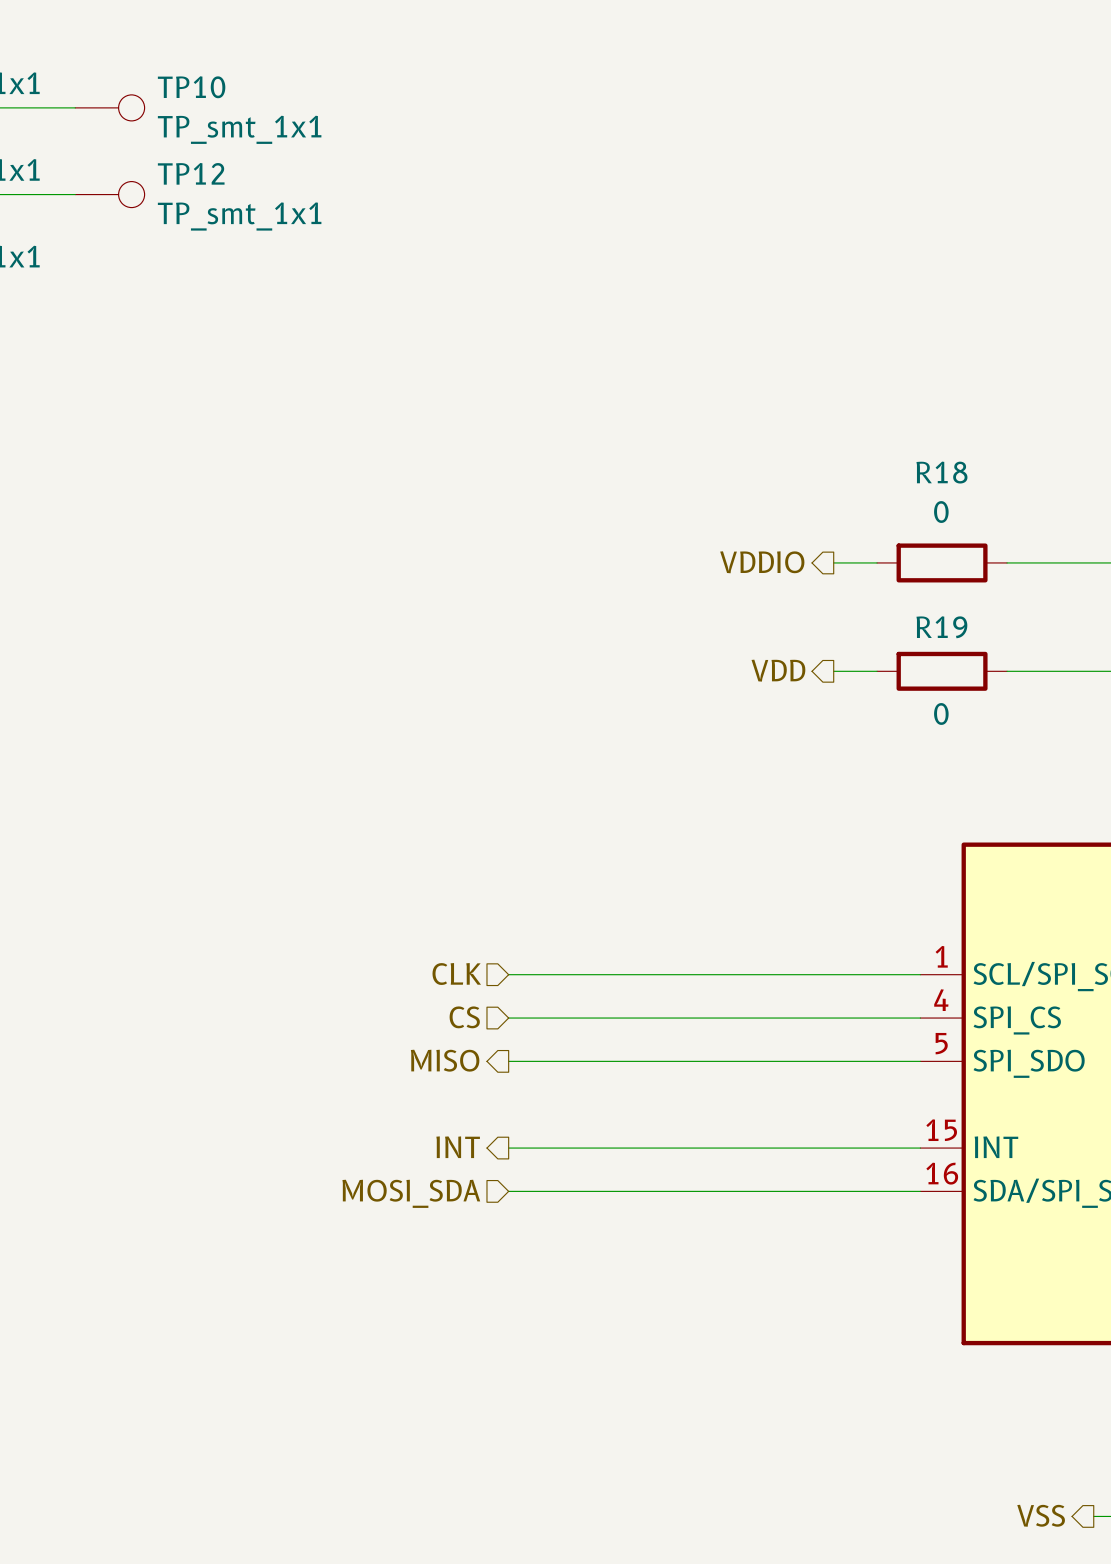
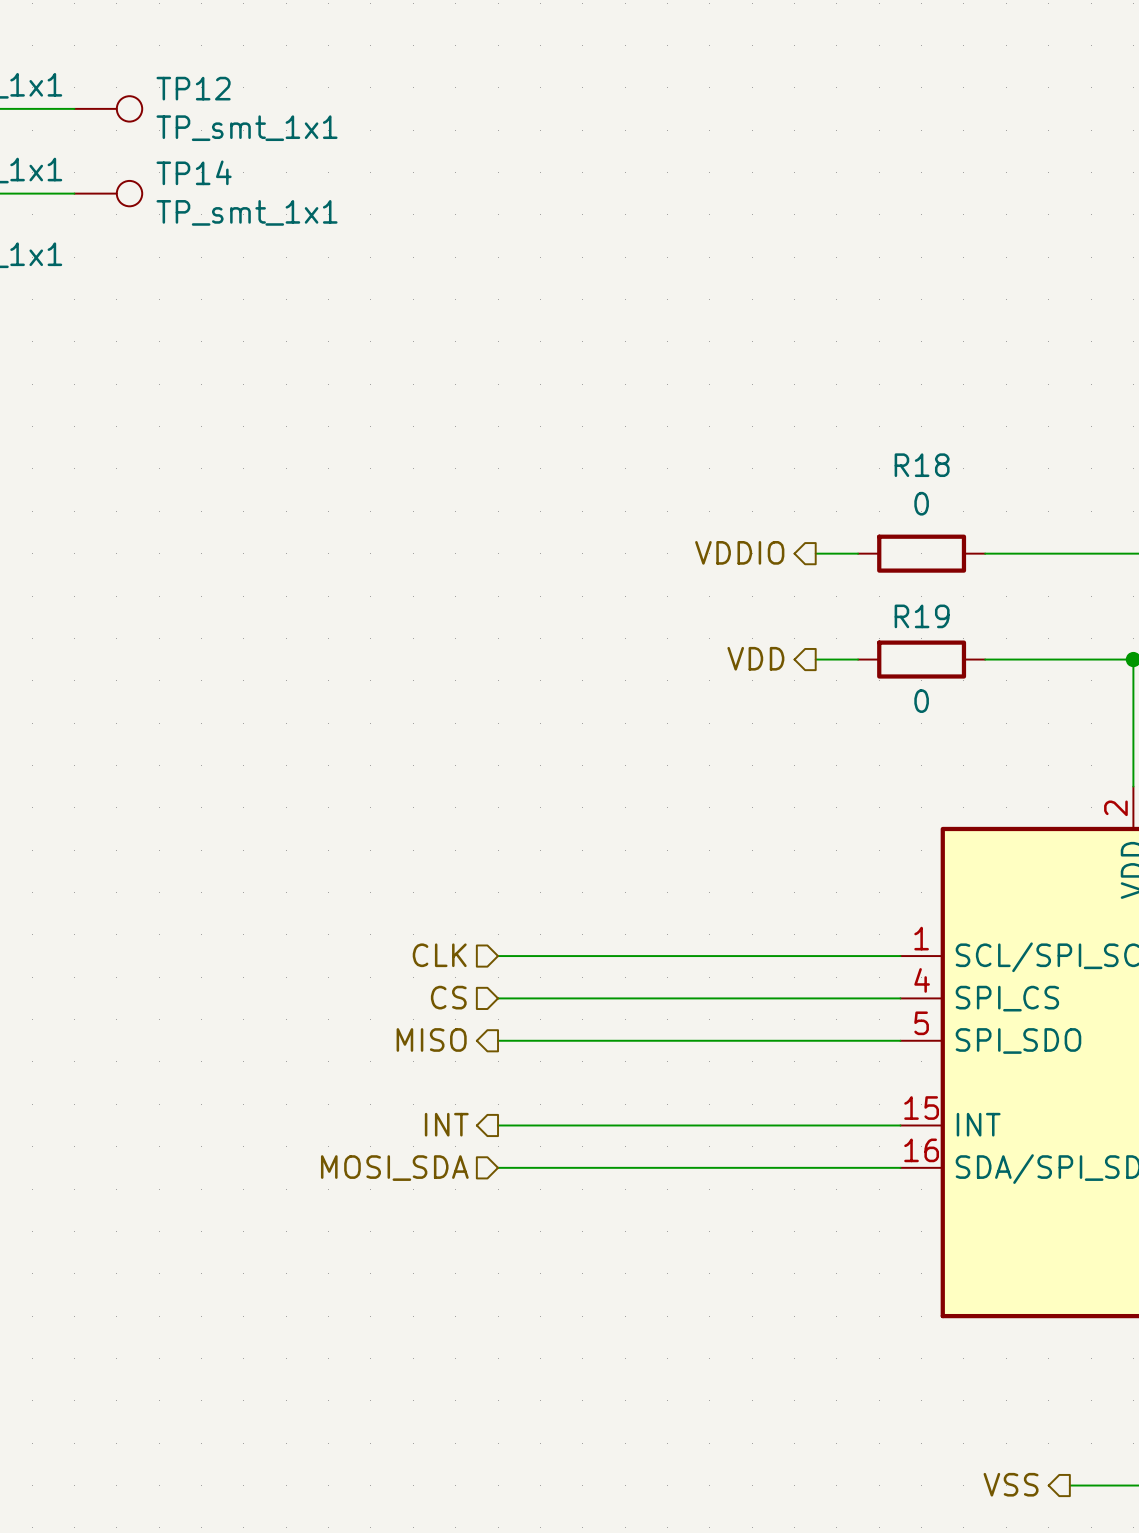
TP10 name: TP10 (191, 87) -> TP12 (193, 88)
TP12 name: TP12 (191, 173) -> TP14 (194, 172)

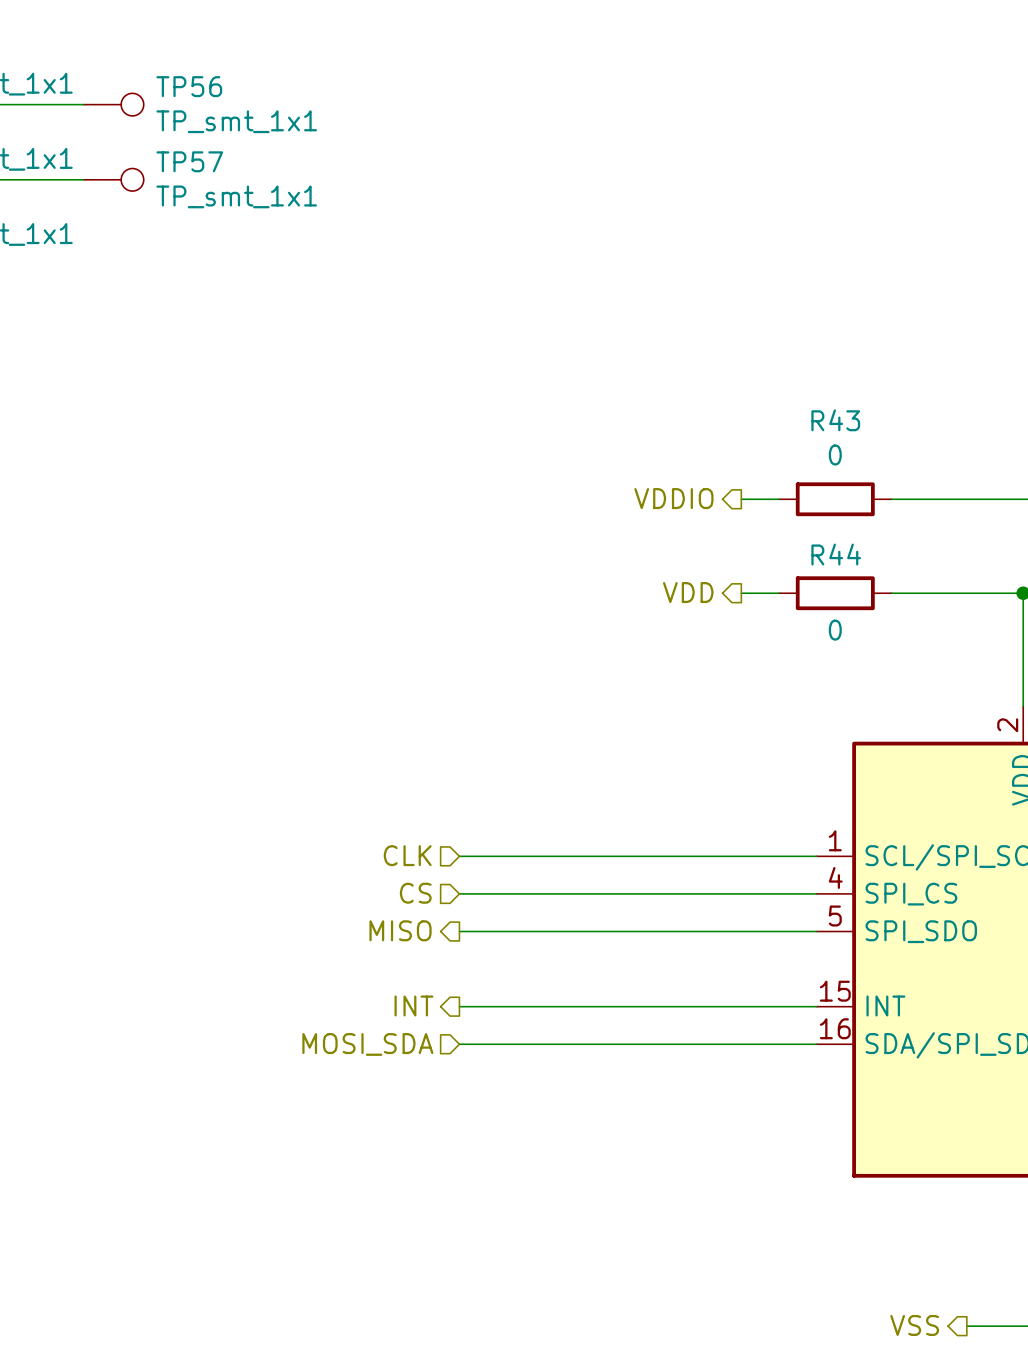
TP12 name: TP12 (193, 88) -> TP56 (189, 86)
TP14 name: TP14 (194, 172) -> TP57 (189, 161)
R18 name: R18 (922, 465) -> R43 (835, 420)
R19 name: R19 (922, 616) -> R44 (836, 554)

